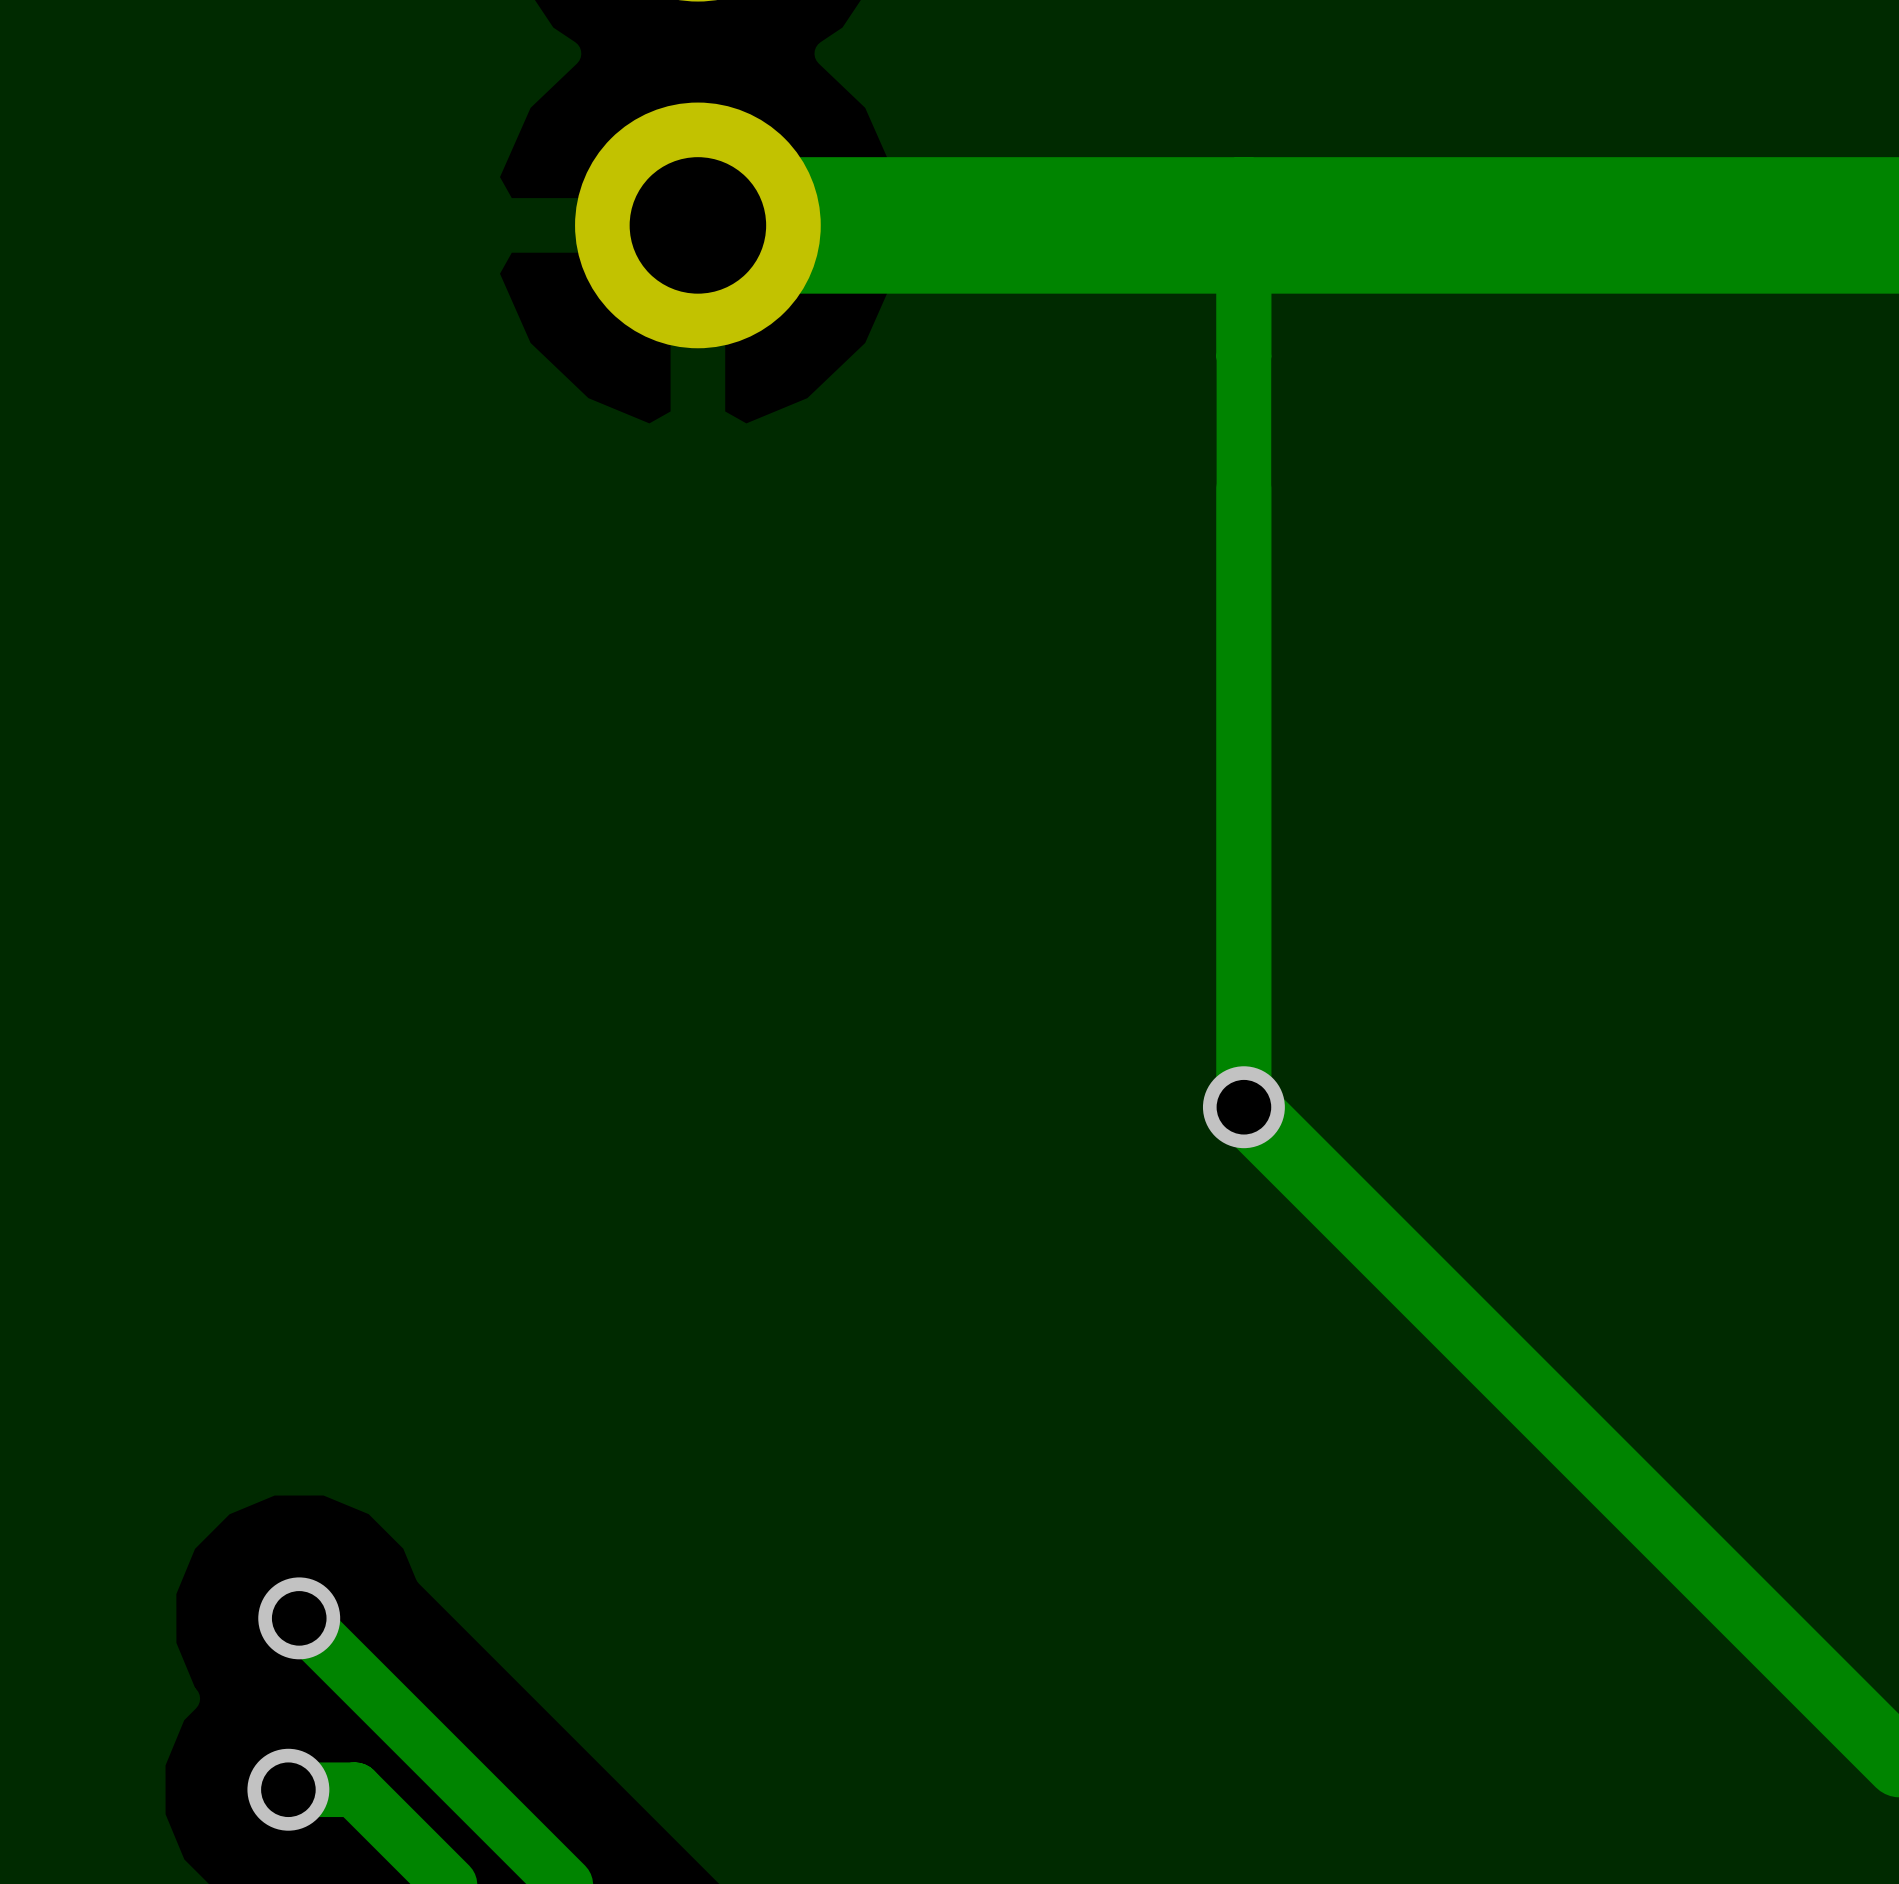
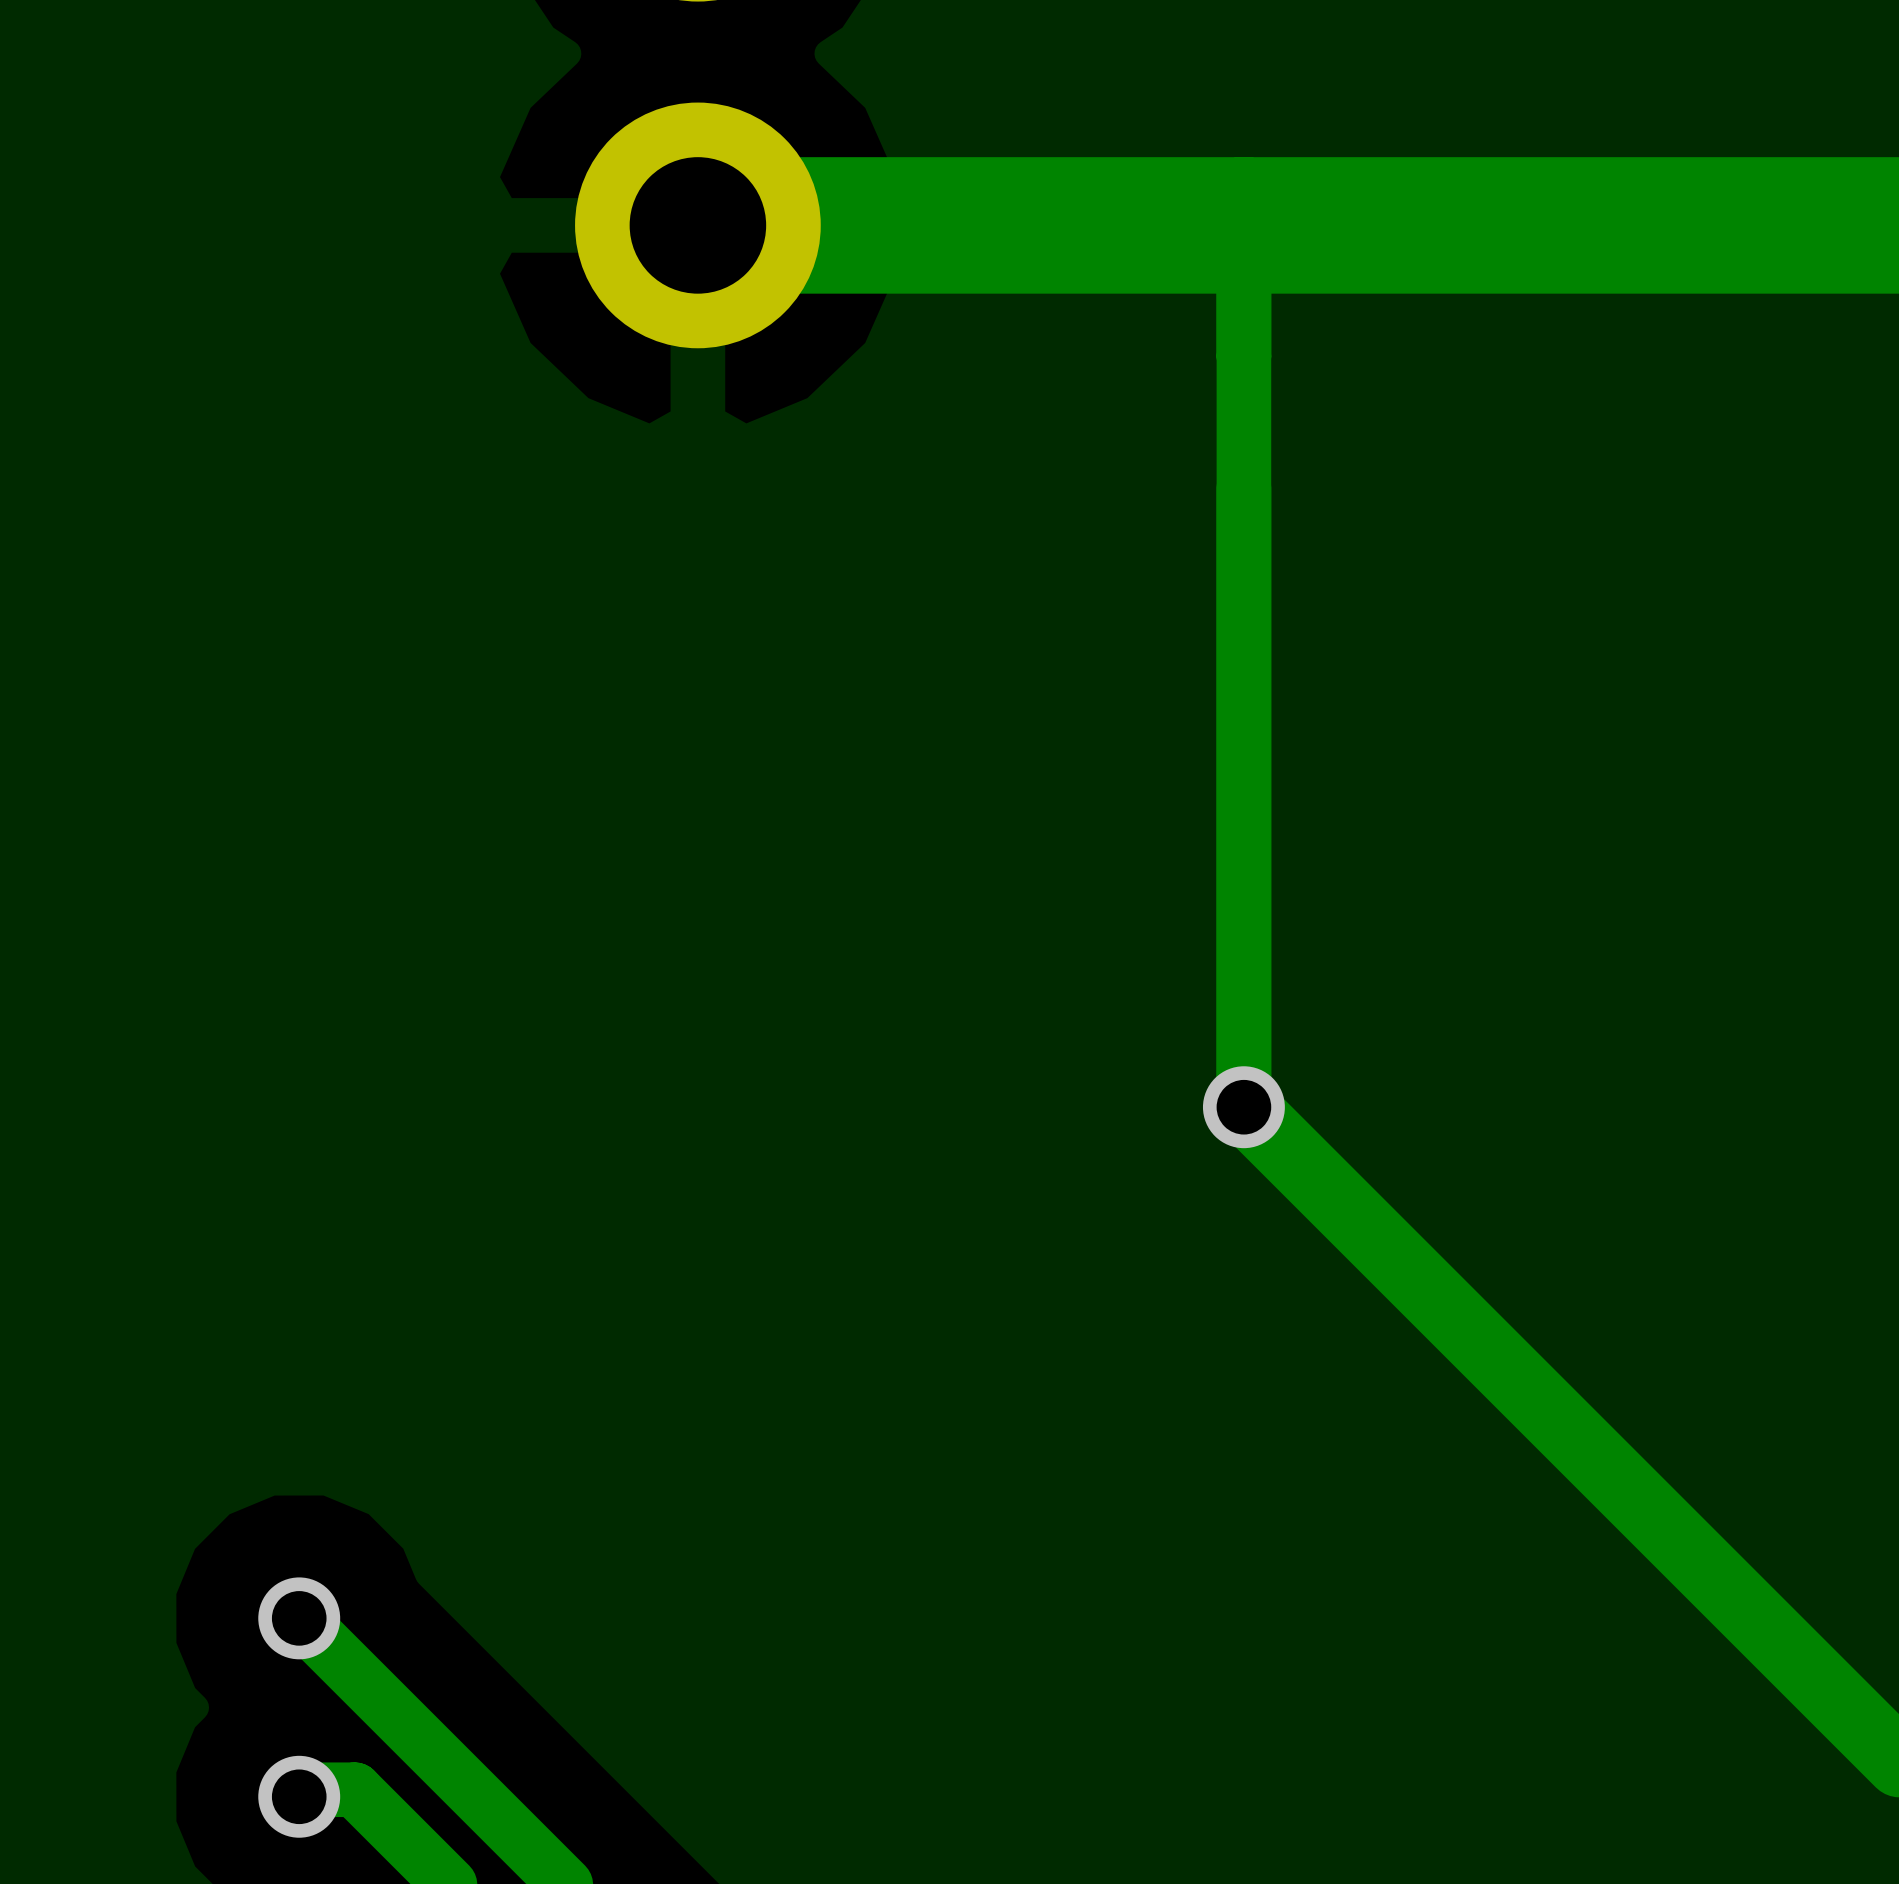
via position: (288, 1789) -> (299, 1796)

